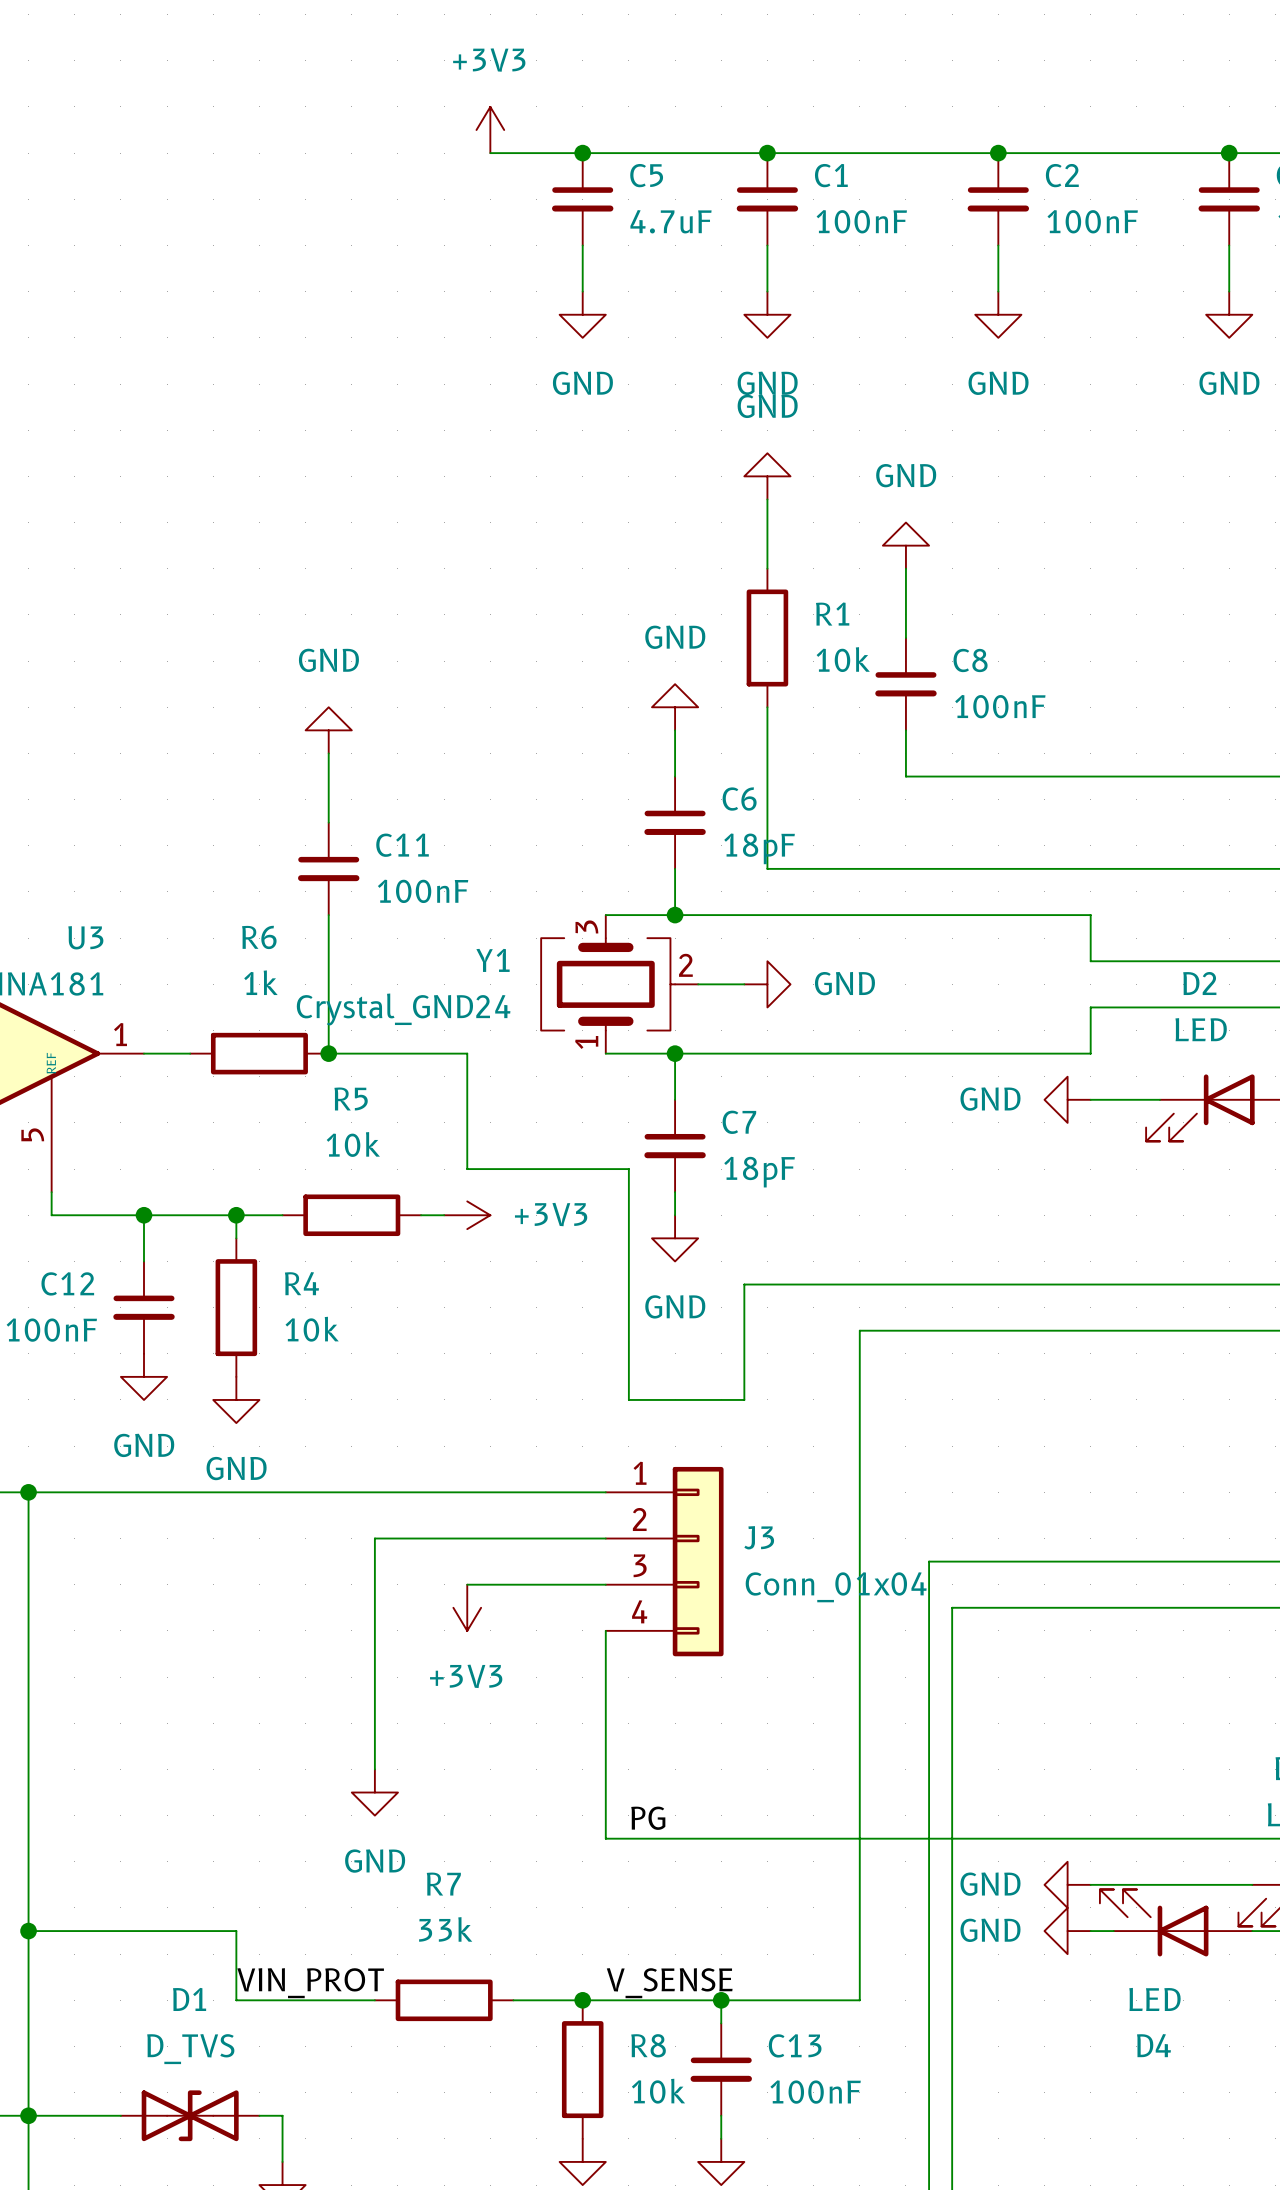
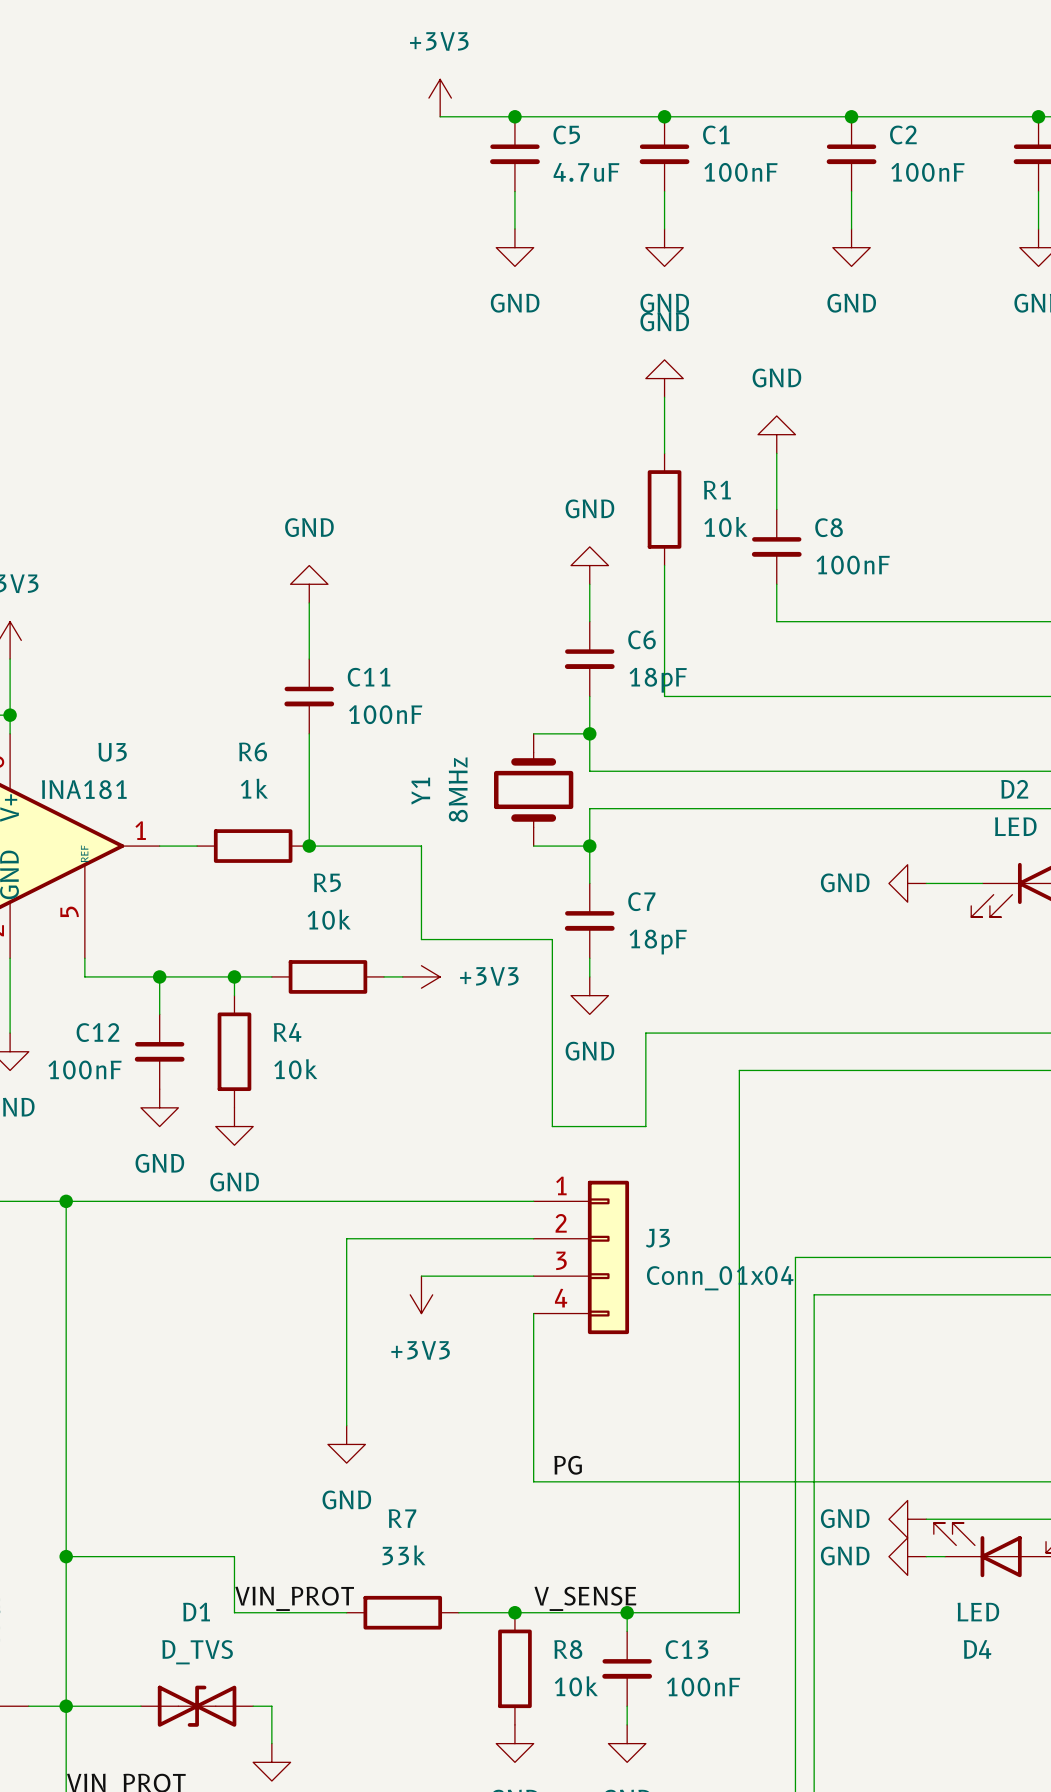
Y1 symbol: [541, 915, 699, 1054] -> [494, 733, 574, 847]
wire: (675, 915) (1090, 915) (1090, 961) -> (589, 733) (589, 771) (926, 771)
wire: (698, 984) (744, 984) -> none
power symbol: GND (767, 984) -> none
wire: (1090, 1007) (1090, 1053) (675, 1053) -> (926, 808) (589, 808) (589, 846)
Y1 value: Crystal_GND24 (403, 1009) -> 8MHz (458, 789)

